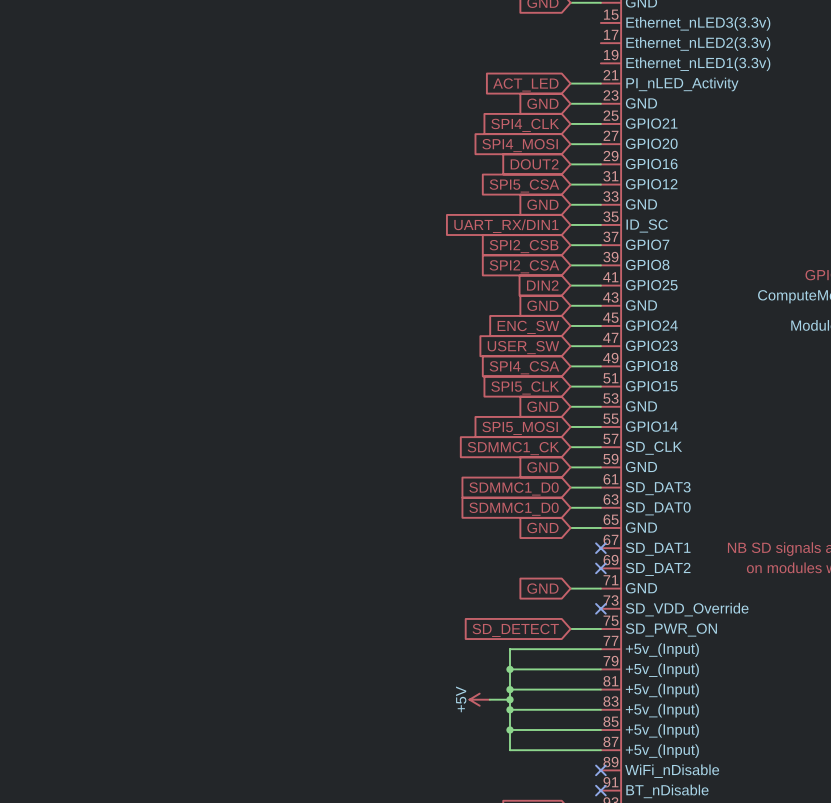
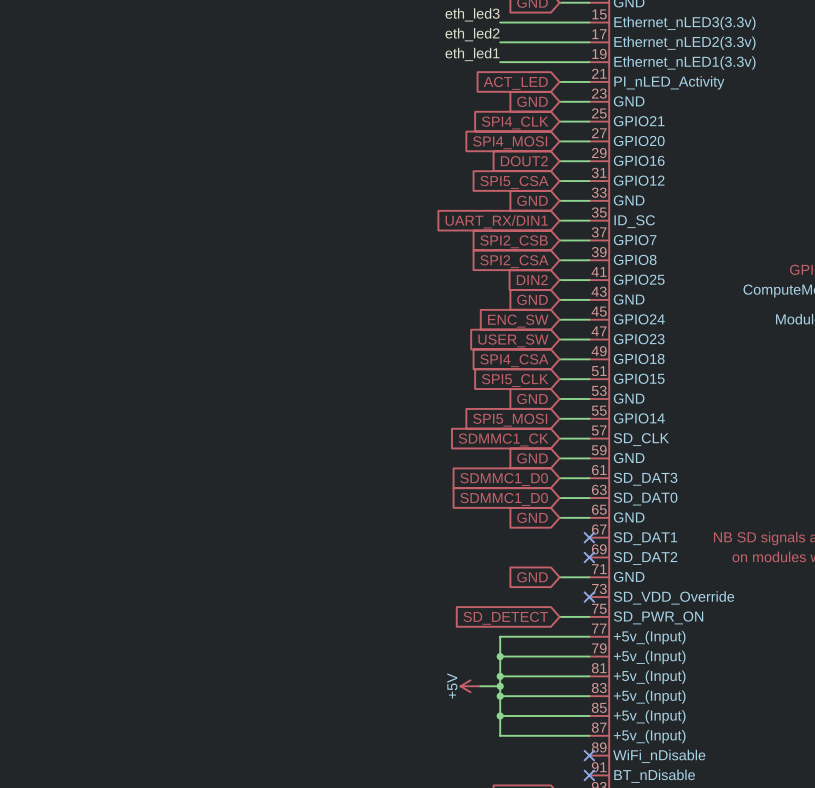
label: none -> eth_led3 (472, 14)
wire: none -> (500, 22) (589, 22)
label: none -> eth_led2 (472, 34)
wire: none -> (500, 42) (589, 42)
label: none -> eth_led1 (472, 54)
wire: none -> (500, 62) (589, 62)

